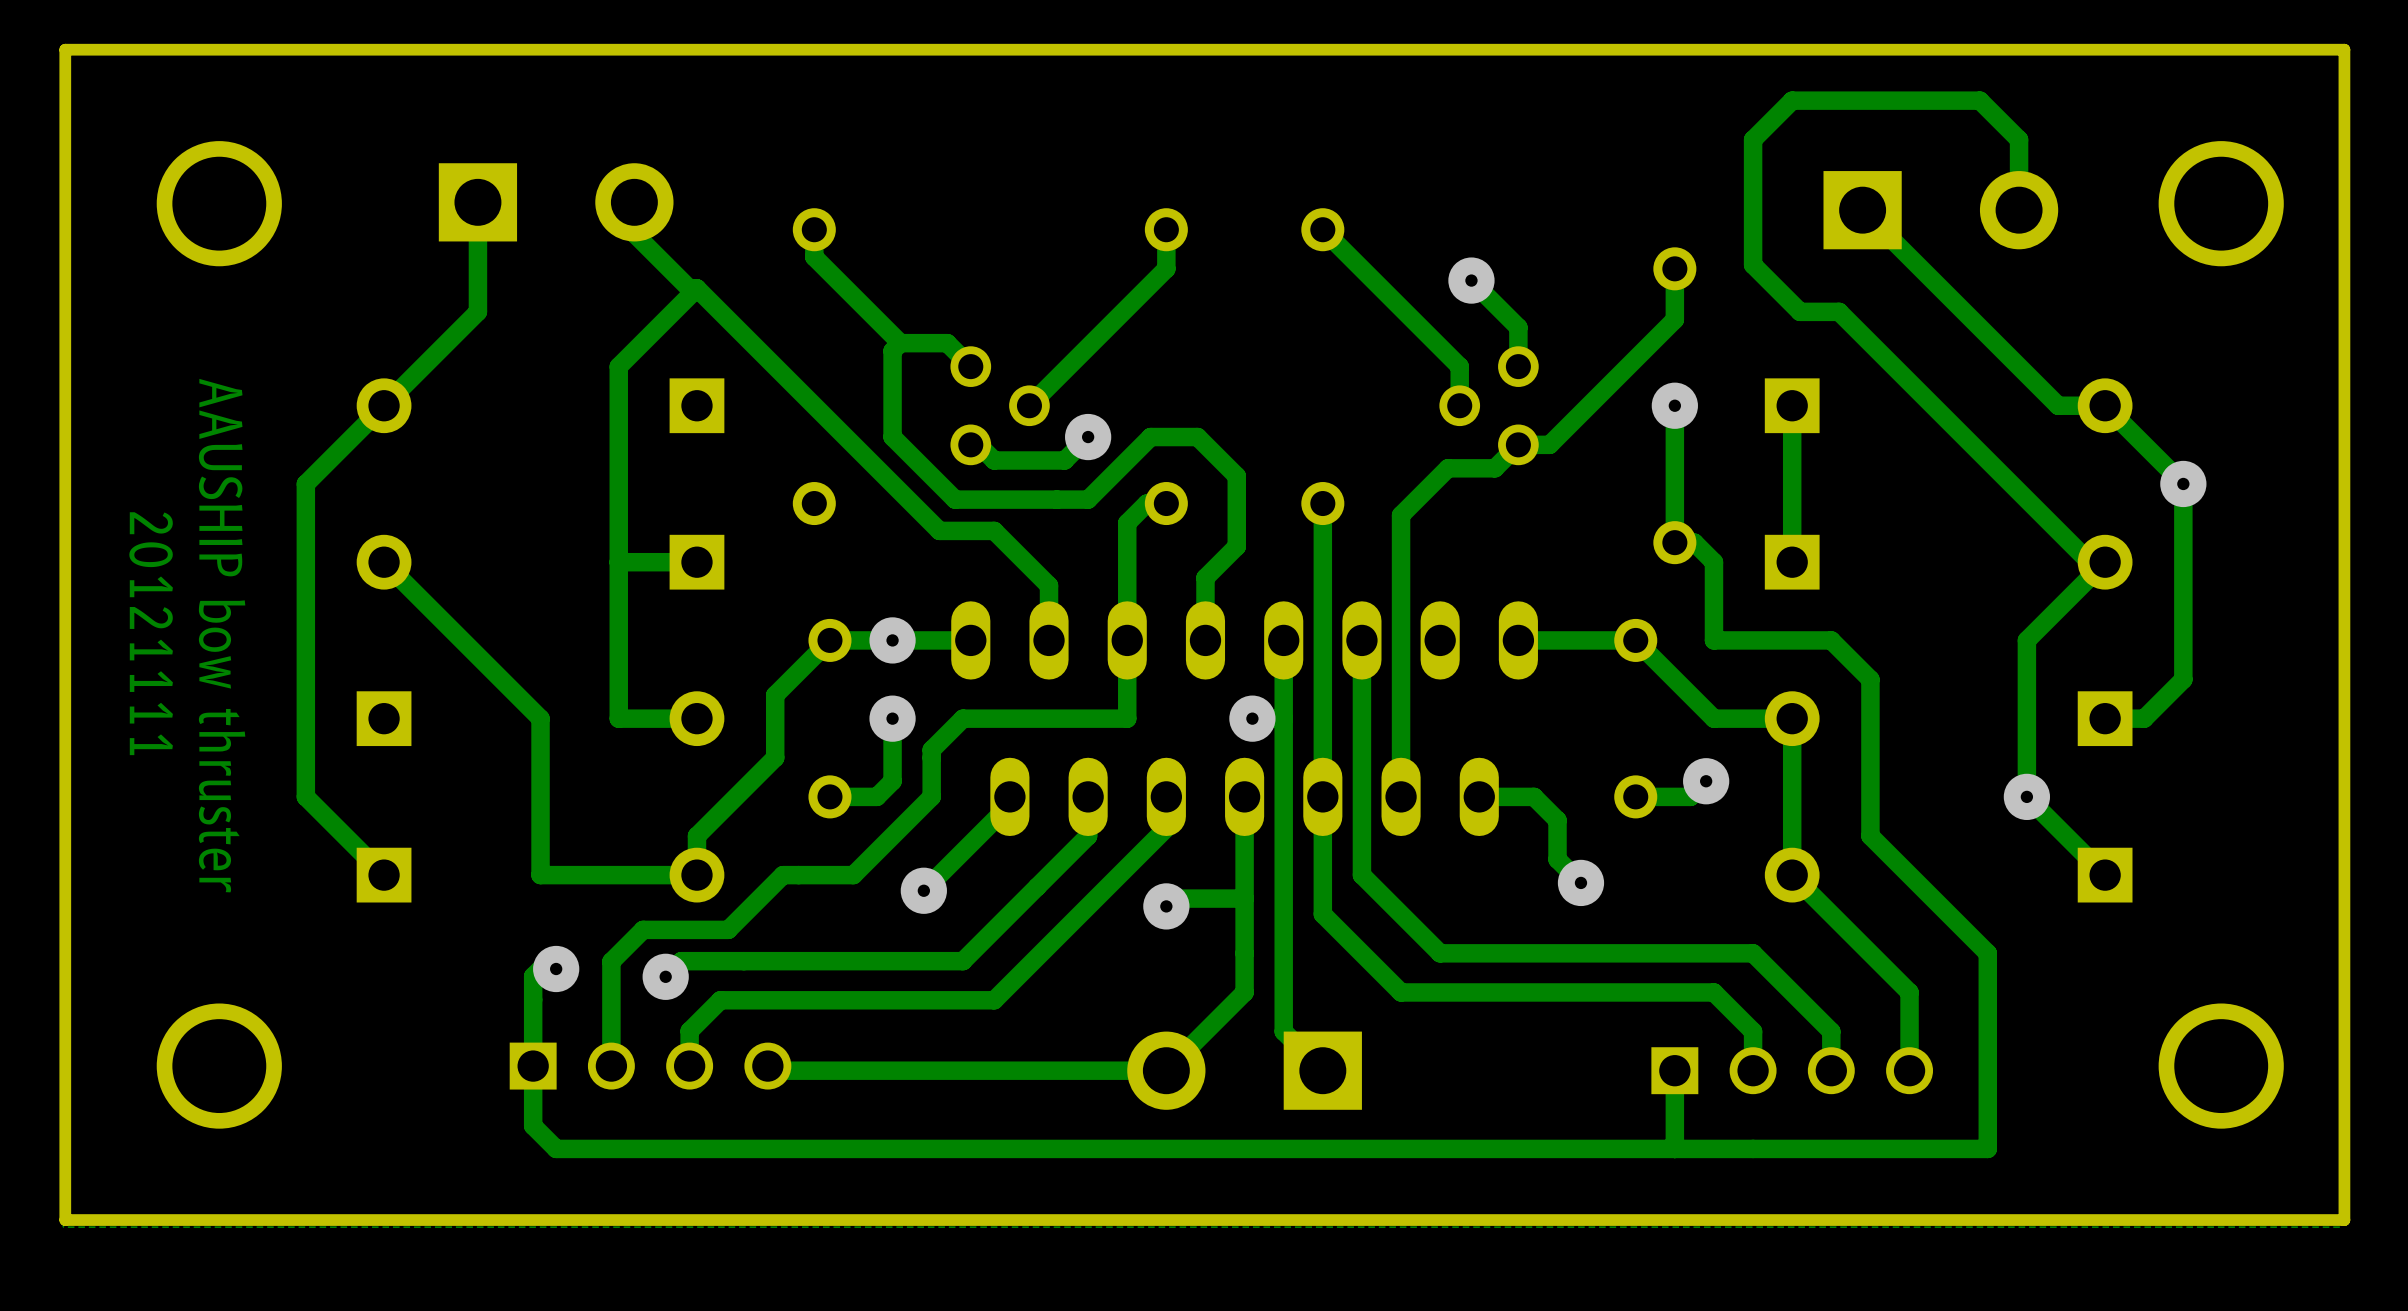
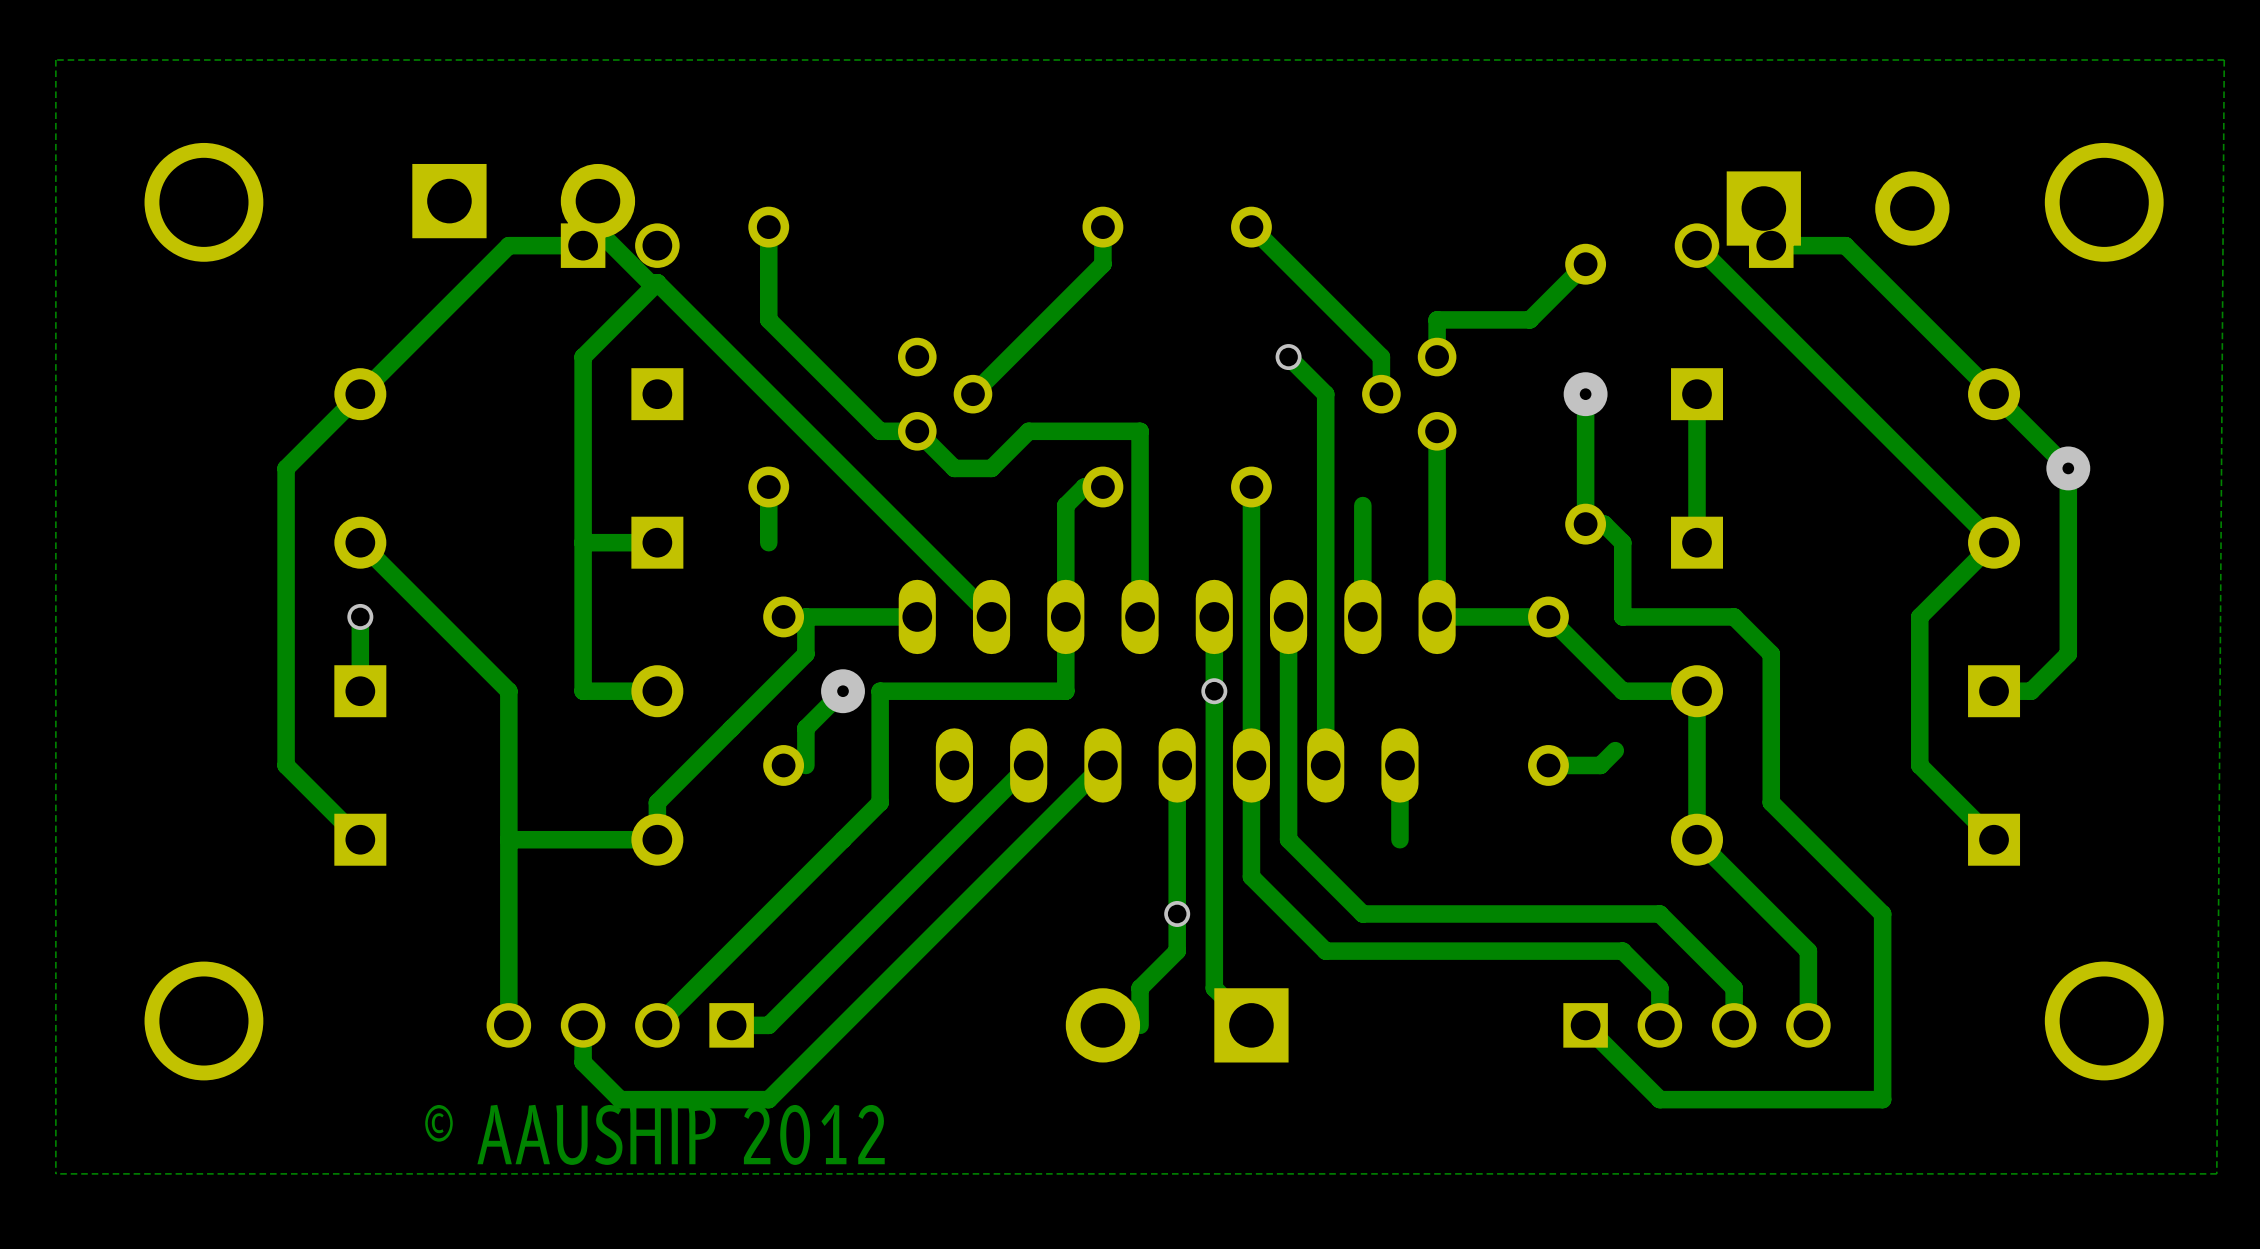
board edge: (2344, 49) (2344, 1220) (65, 1220) (65, 49) (2344, 49) -> none
track: (477, 202) (477, 311) -> (583, 245) (508, 245) (449, 305)
track: (1862, 210) (2058, 405) (2105, 405) -> (1771, 245) (1845, 245) (1994, 394)
track: (2019, 210) (2019, 139) (1979, 100) (1792, 100) (1753, 139) (1753, 264) (1800, 311) (1839, 311) (2089, 562) (2105, 562) -> (1697, 245) (1994, 542)
part: none -> (620, 245)
part: none -> (1734, 245)
track: (814, 257) (900, 343) -> none
track: (1674, 268) (1674, 319) (1549, 444) (1518, 444) (1494, 468) (1447, 468) (1401, 515) -> (1288, 357) (1325, 394) (1325, 498)
track: (1471, 280) (1518, 327) -> (1585, 264) (1529, 319) (1437, 319)
via: (1471, 280) -> none
track: (900, 343) (892, 350) (892, 437) (955, 499) (1088, 499) (1150, 437) (1197, 437) (1236, 476) (1236, 546) (1205, 577) -> (768, 253) (768, 319) (880, 431) (917, 431) (954, 468) (991, 468) (1028, 431) (1140, 431) (1140, 557)
track: (900, 343) (947, 343) (970, 366) -> none
via: none -> (1288, 357)
track: (1088, 437) (1064, 460) (994, 460) (978, 444) (970, 444) -> none
via: (1088, 437) -> none
track: none -> (1437, 431) (1437, 616)
track: none -> (768, 486) (768, 542)
track: none -> (1362, 505) (1362, 616)
track: (939, 530) (994, 530) (1049, 585) (1049, 640) -> (887, 512) (991, 616)
text: 20121111 (151, 633) -> none
text: AAUSHIP bow thruster (222, 635) -> none
track: none -> (360, 616) (360, 691)
via: none -> (360, 616)
track: (853, 640) (829, 640) (775, 695) (775, 757) -> (805, 616) (805, 654) (731, 728)
via: (892, 640) -> none
track: (892, 718) (892, 781) (876, 796) (829, 796) -> (843, 691) (805, 728) (805, 765)
track: (962, 718) (931, 749) -> (909, 691) (880, 691) (880, 720)
via: (1252, 718) -> none
via: none -> (1214, 691)
via: (1706, 781) -> none
track: (931, 796) (853, 875) (783, 875) (728, 929) (643, 929) (611, 961) (611, 1066) -> (880, 765) (880, 802) (657, 1025)
track: (1009, 796) (1009, 804) (923, 890) -> none
track: (1088, 796) (1088, 836) (962, 961) (681, 961) (665, 976) -> (1028, 765) (768, 1025)
track: (1166, 796) (1166, 828) (994, 1000) (720, 1000) (689, 1031) (689, 1066) -> (1102, 765) (768, 1099)
track: (1479, 796) (1534, 796) (1557, 820) (1557, 859) (1580, 882) -> (1399, 765) (1399, 839)
via: (2026, 796) -> none
track: none -> (508, 839) (508, 1025)
via: (1580, 882) -> none
via: (923, 890) -> none
track: (1244, 898) (1174, 898) (1166, 906) -> none
via: (1166, 906) -> none
via: none -> (1177, 913)
track: (556, 968) (540, 968) (533, 976) (533, 1125) (556, 1148) (657, 1148) -> (583, 1025) (583, 1062) (620, 1099)
via: (556, 968) -> none
via: (665, 976) -> none
track: (1205, 1031) (1166, 1070) (814, 1070) -> (1140, 988) (1140, 1025)
part rotation: 0° (650, 1066) -> 180° (620, 1025)
track: (1674, 1070) (1674, 1148) -> (1585, 1025) (1659, 1099)
track: (1753, 1148) (814, 1148) -> none
text: none -> © AAUSHIP 2012 (654, 1134)

